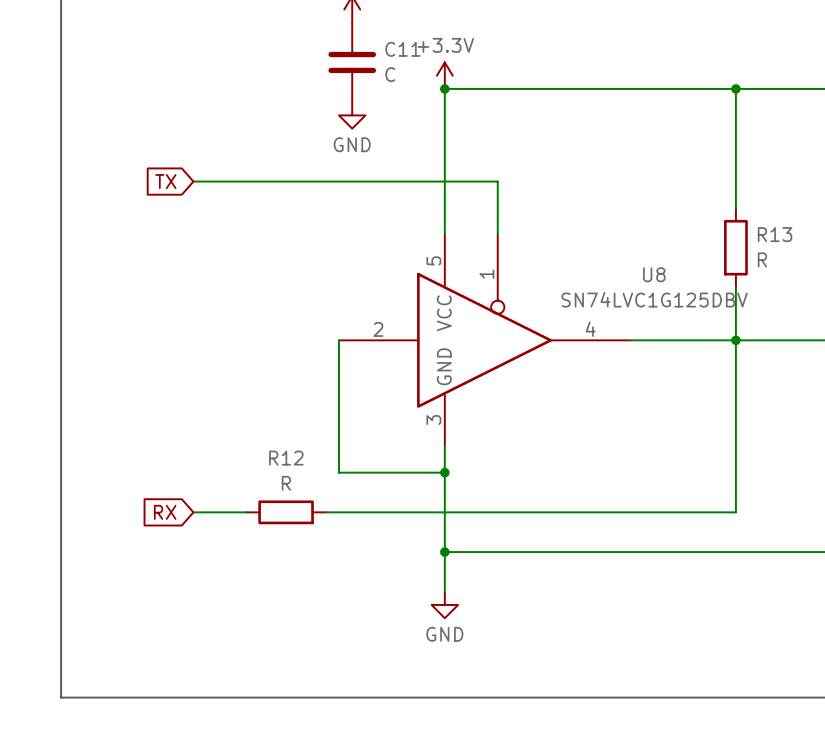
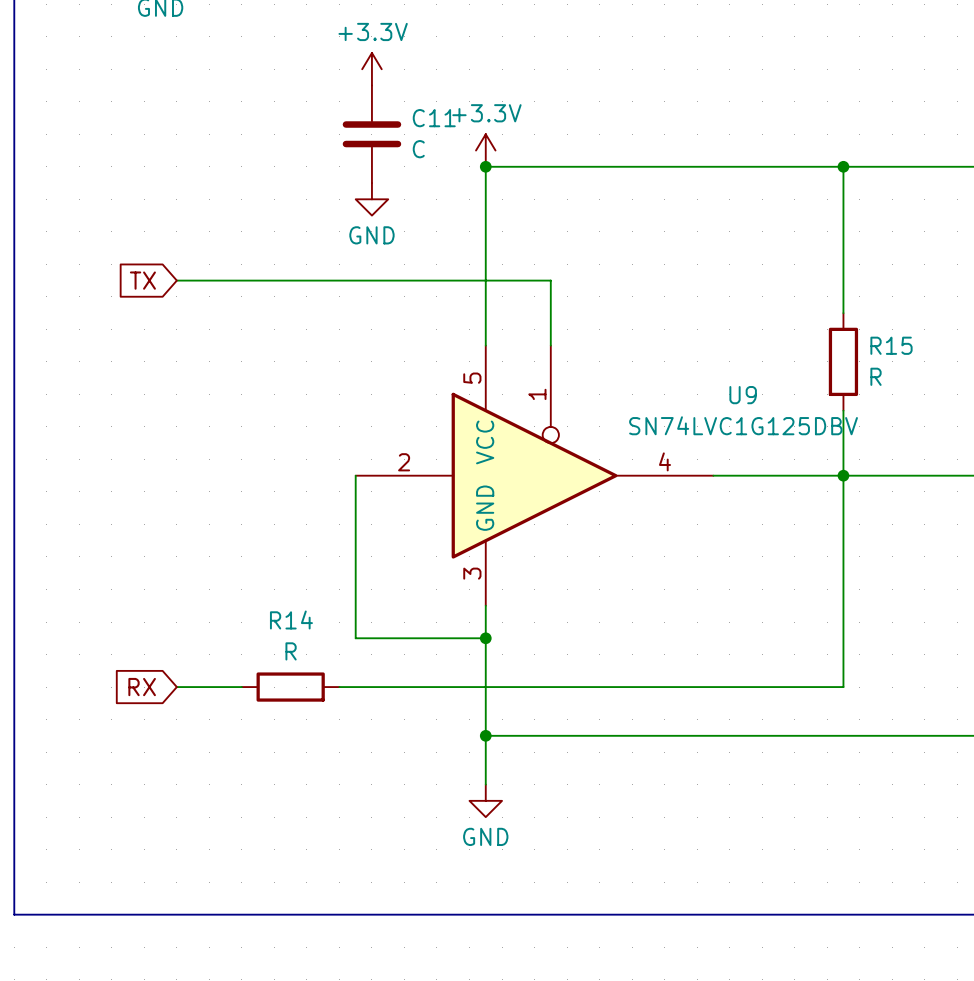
R13 name: R13 (775, 234) -> R15 (891, 345)
U8 name: U8 (654, 274) -> U9 (743, 395)
R12 name: R12 (286, 458) -> R14 (291, 619)

